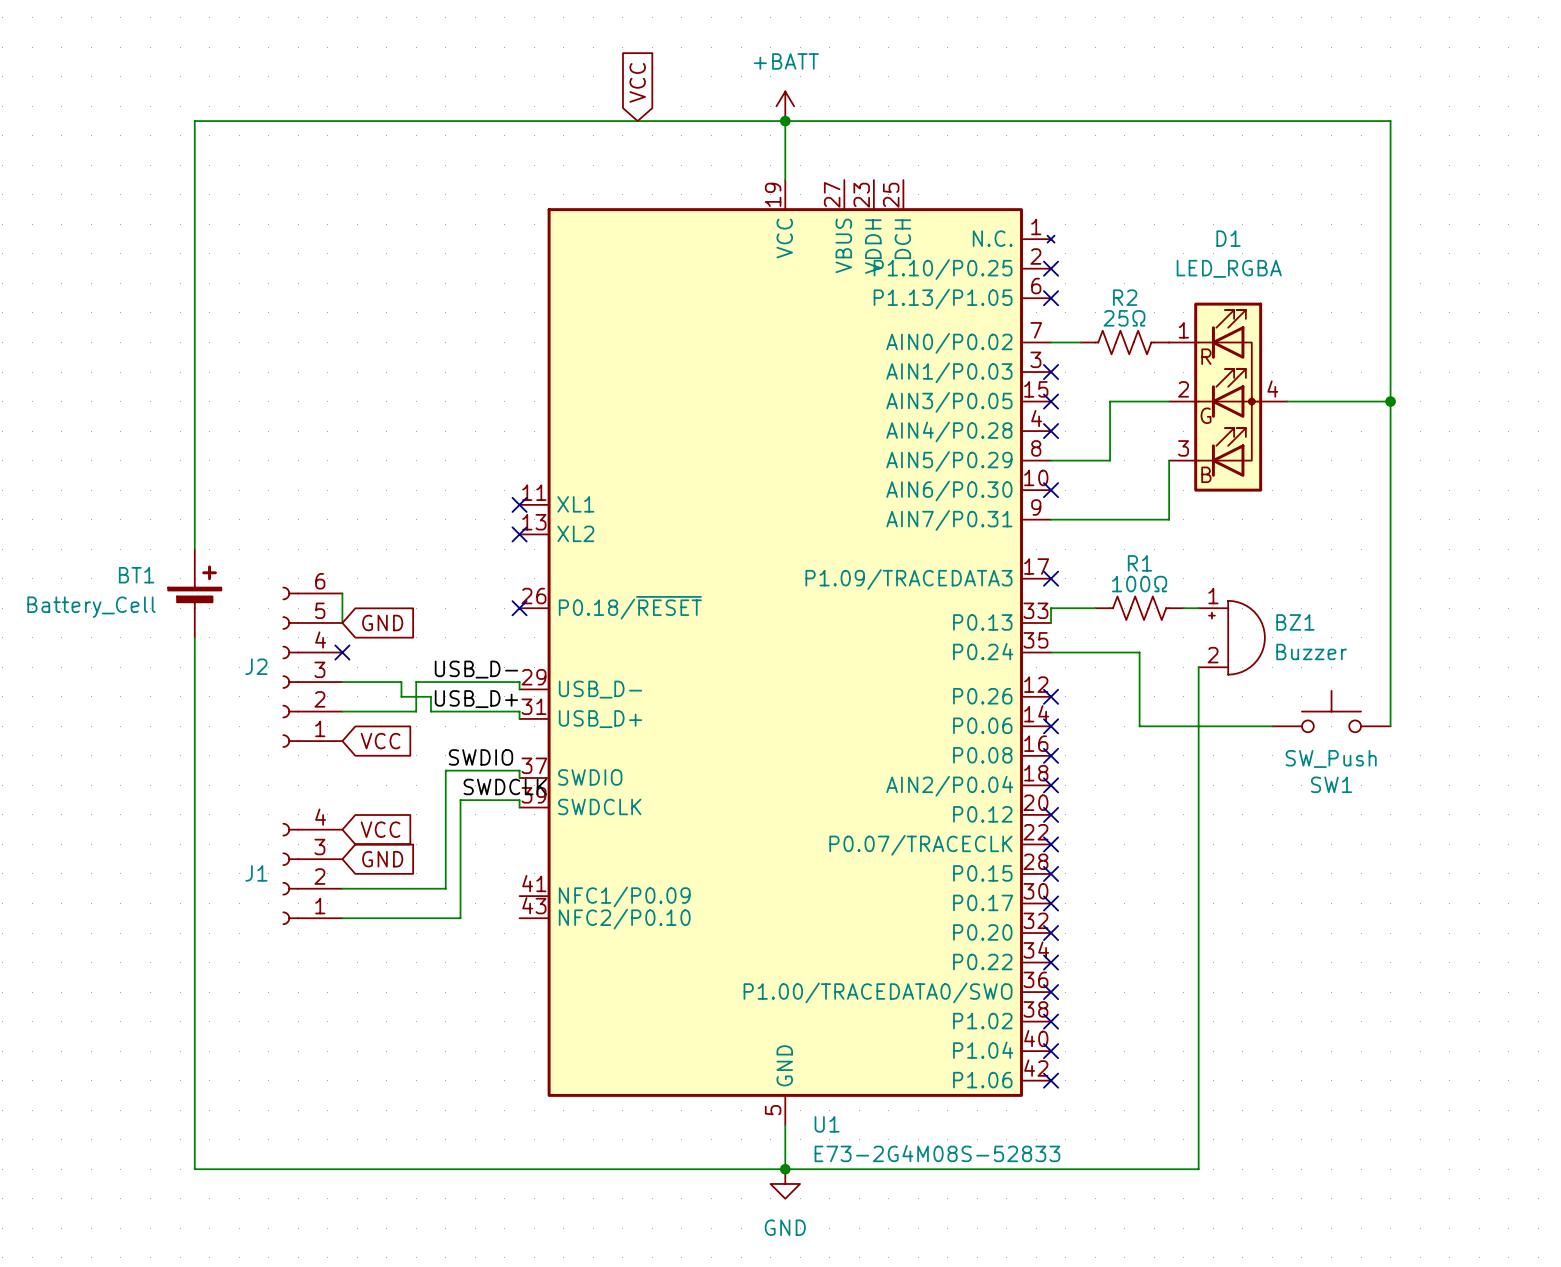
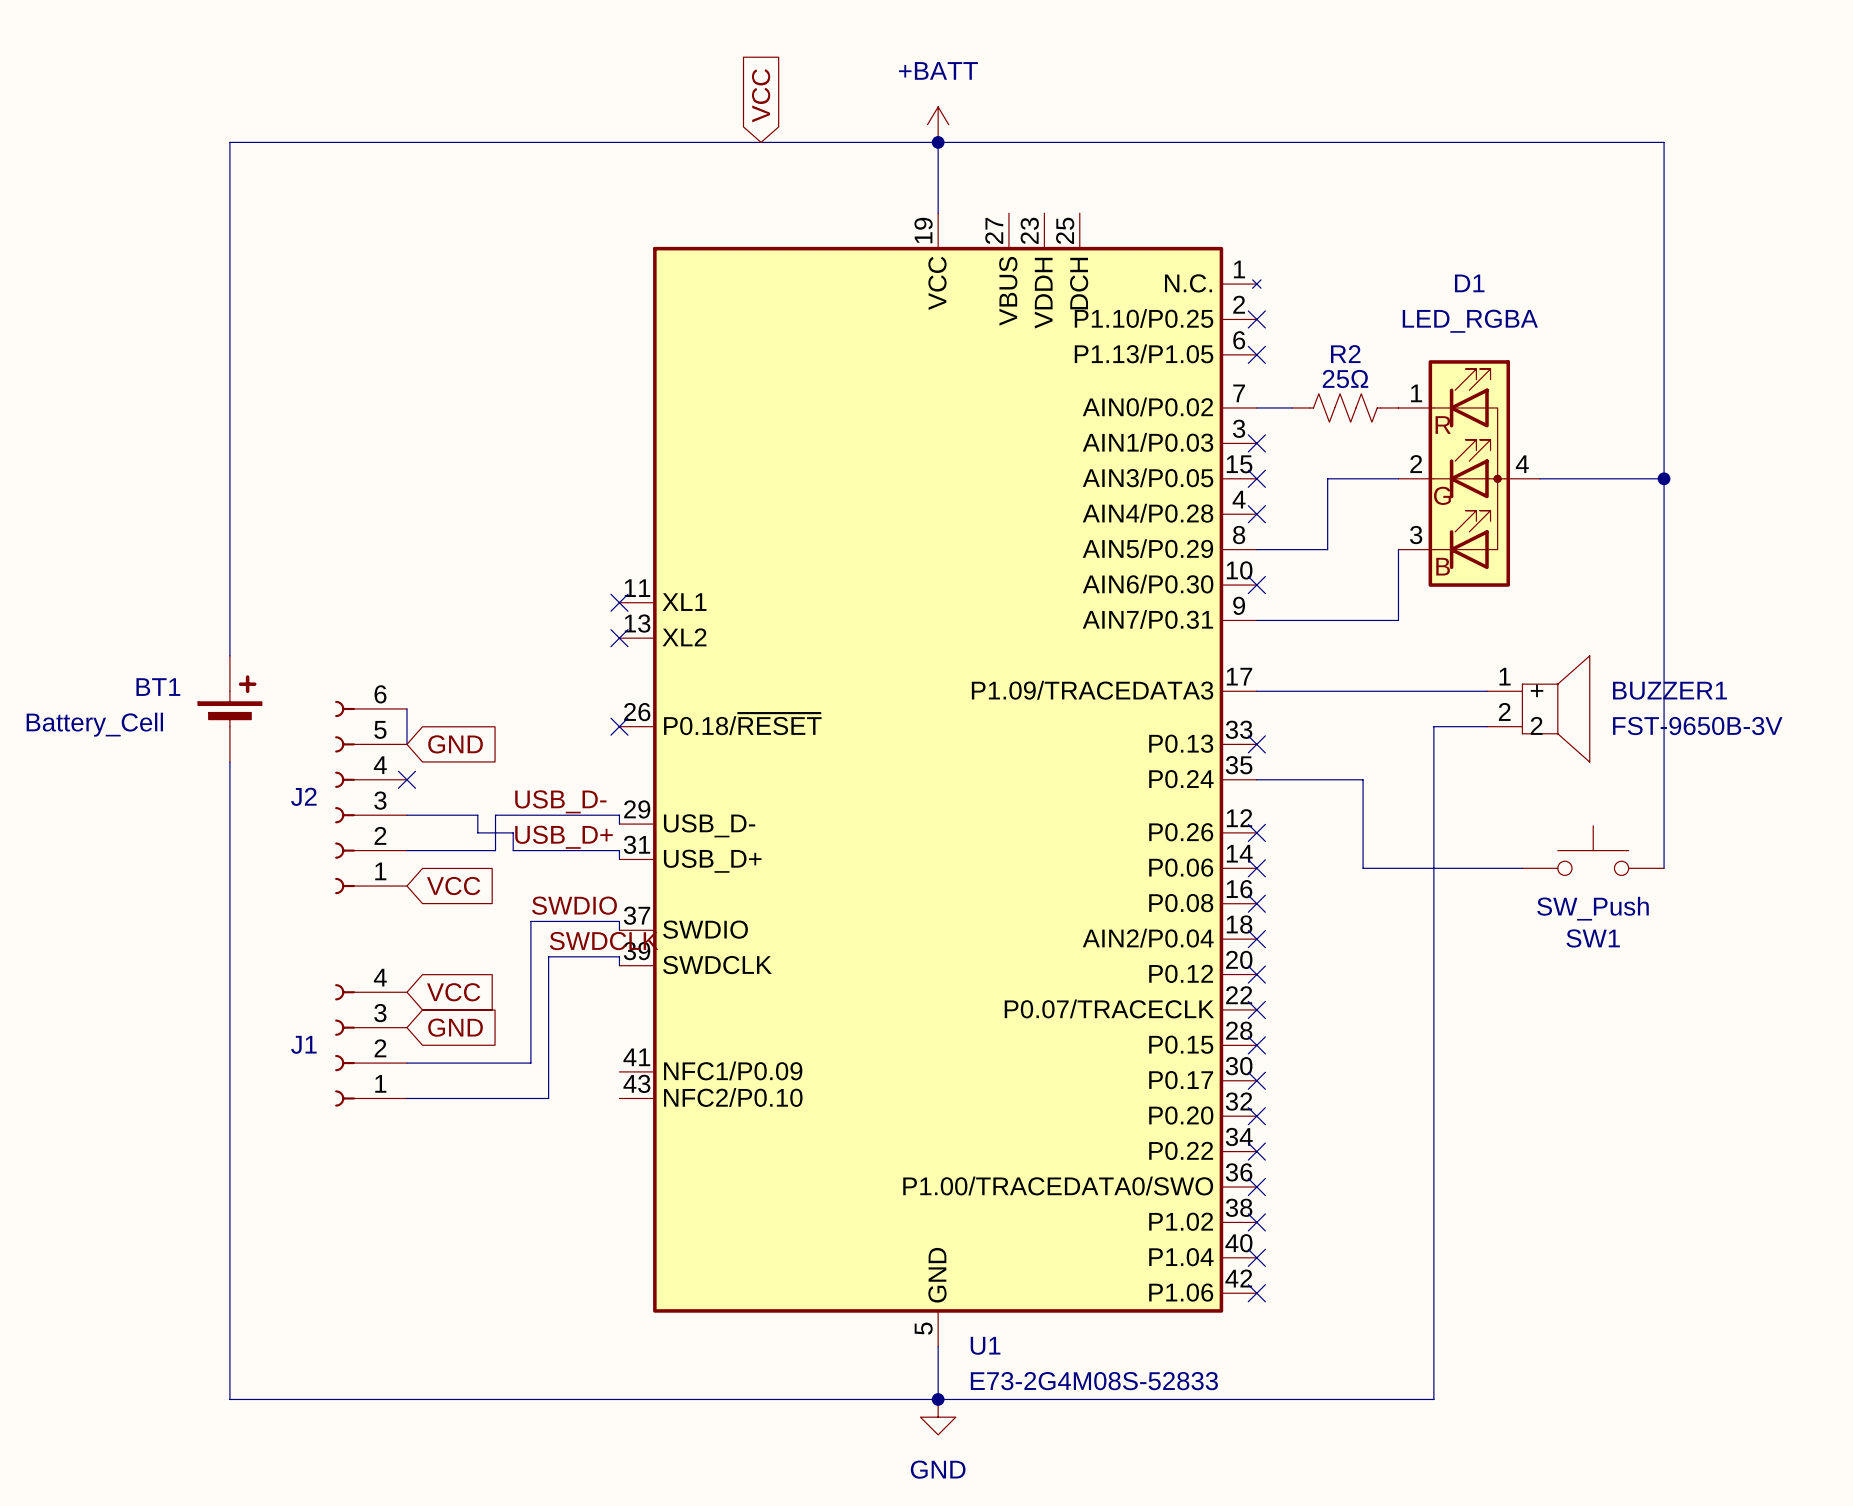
wire: none -> (1256, 691) (1487, 691)
no-connect mark position: (1051, 578) -> (1256, 744)
BUZZER1: none -> FST-9650B-3V (1538, 708)
wire: (1095, 608) (1051, 608) (1051, 622) -> none
R1: 100Ω (1139, 608) -> none
wire: (1183, 608) (1198, 608) -> none
wire: none -> (1487, 726) (1433, 726) (1433, 797)
BZ1: Buzzer (1231, 637) -> none

